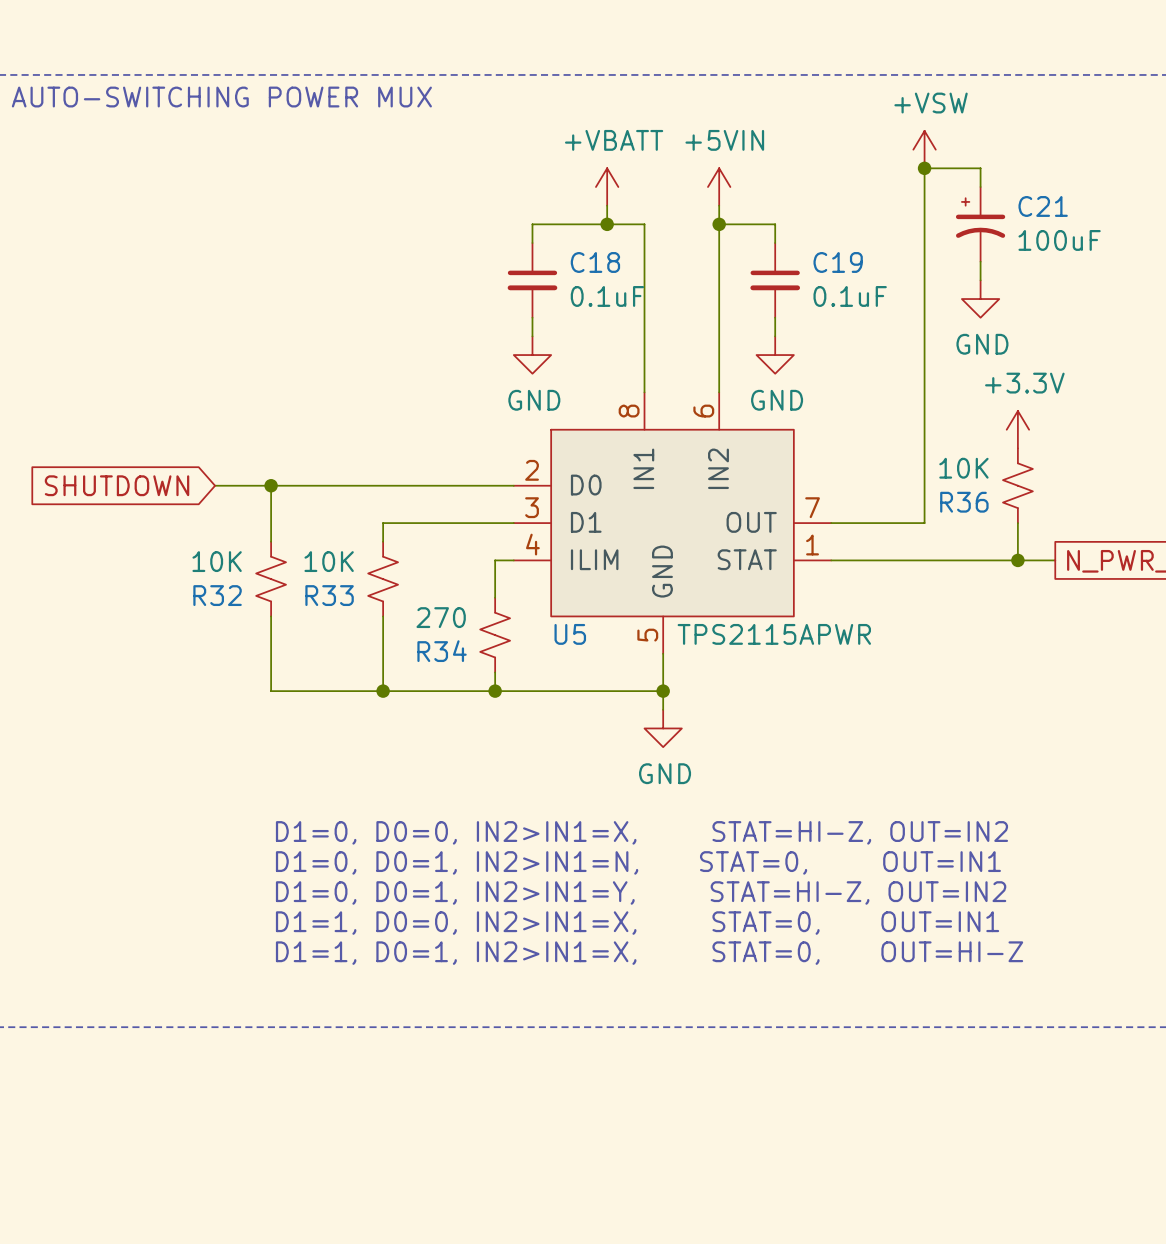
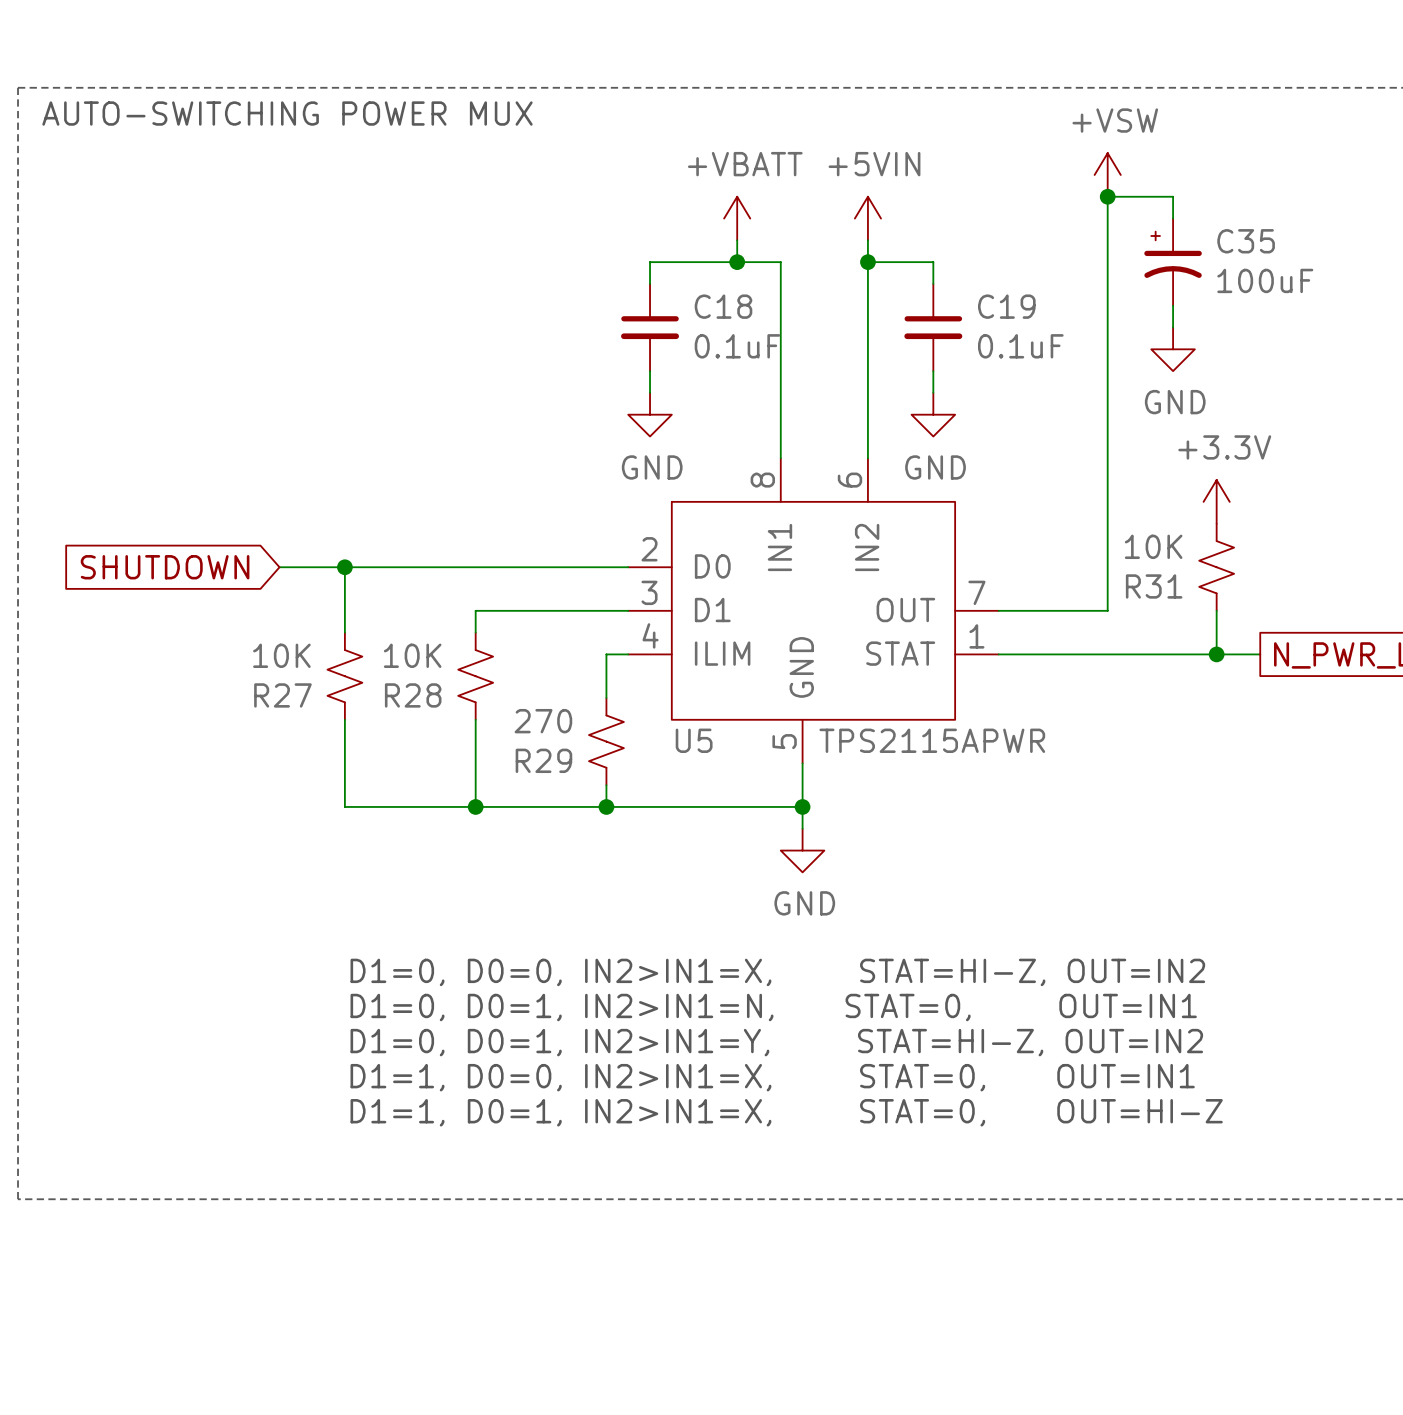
C21 name: C21 (1043, 206) -> C35 (1246, 241)
R36 name: R36 (964, 502) -> R31 (1154, 586)
R32 name: R32 (217, 595) -> R27 (282, 695)
R33 name: R33 (329, 595) -> R28 (413, 695)
R34 name: R34 (442, 651) -> R29 (543, 760)

